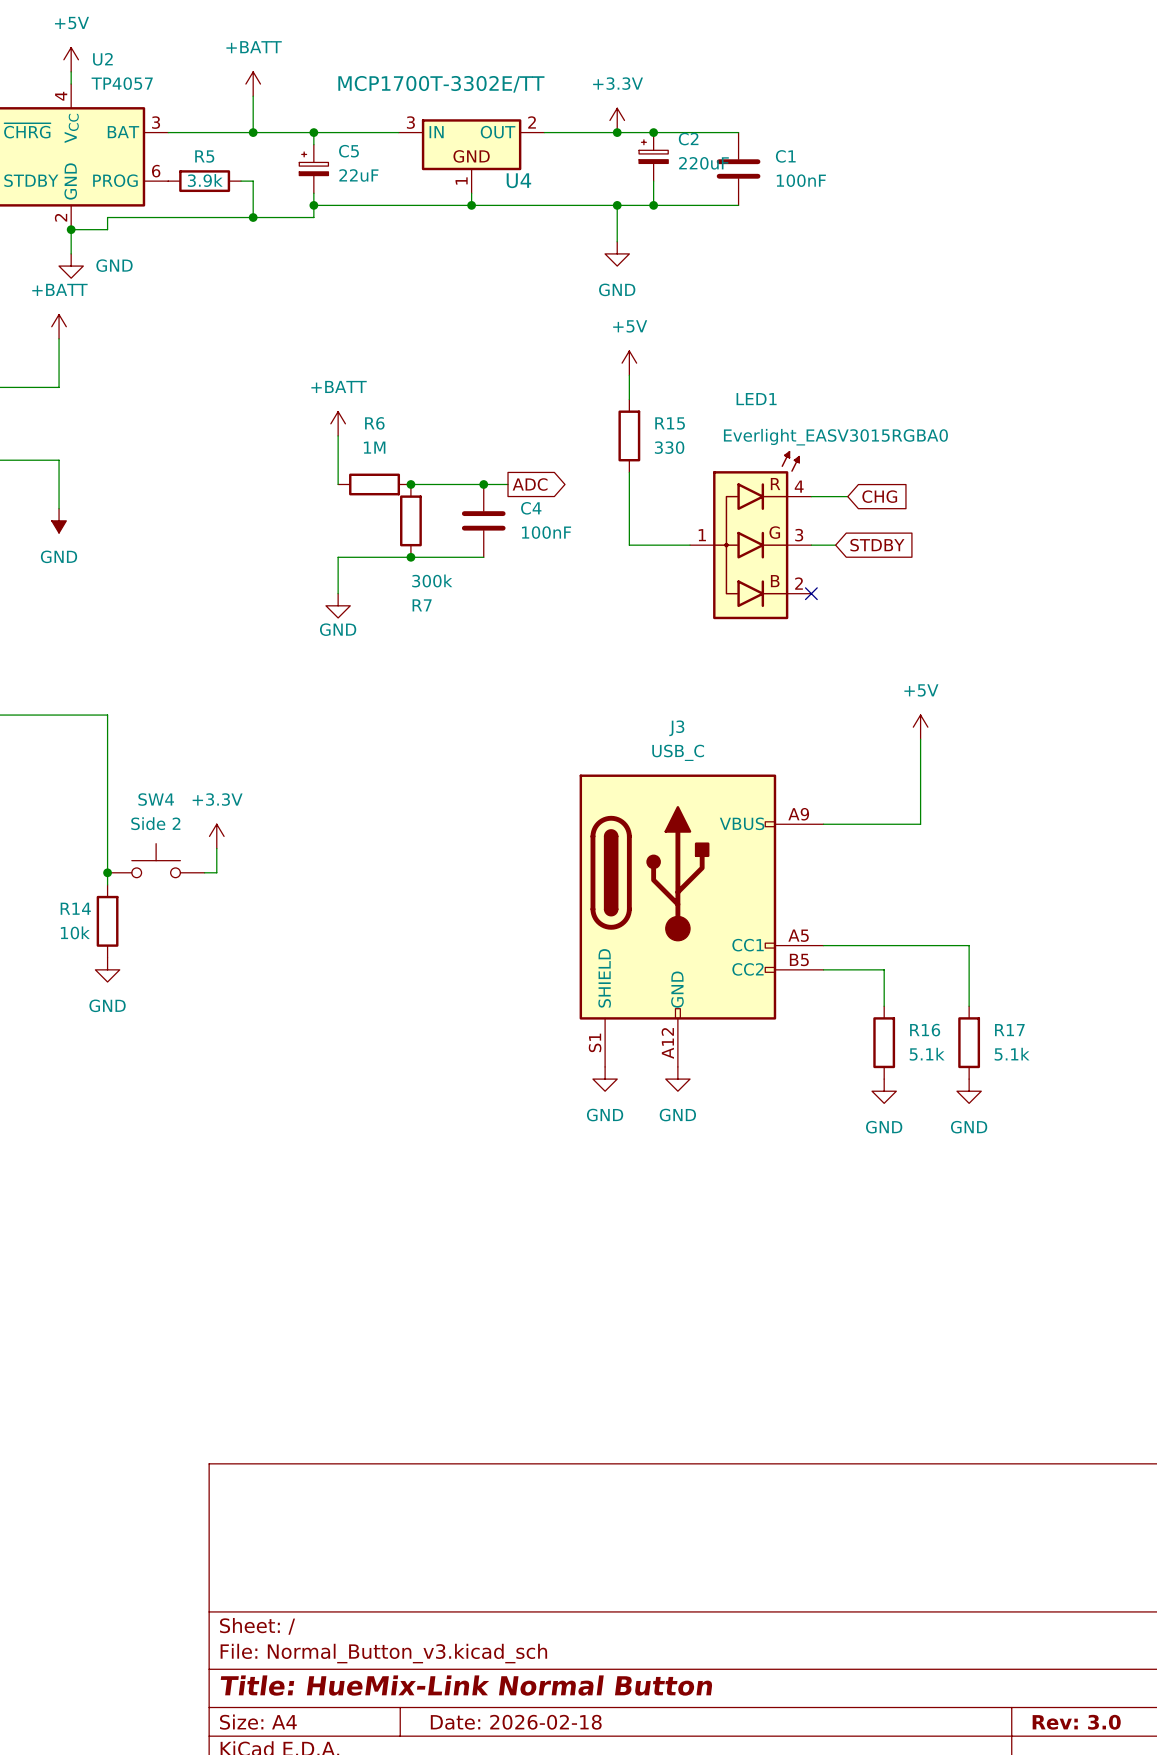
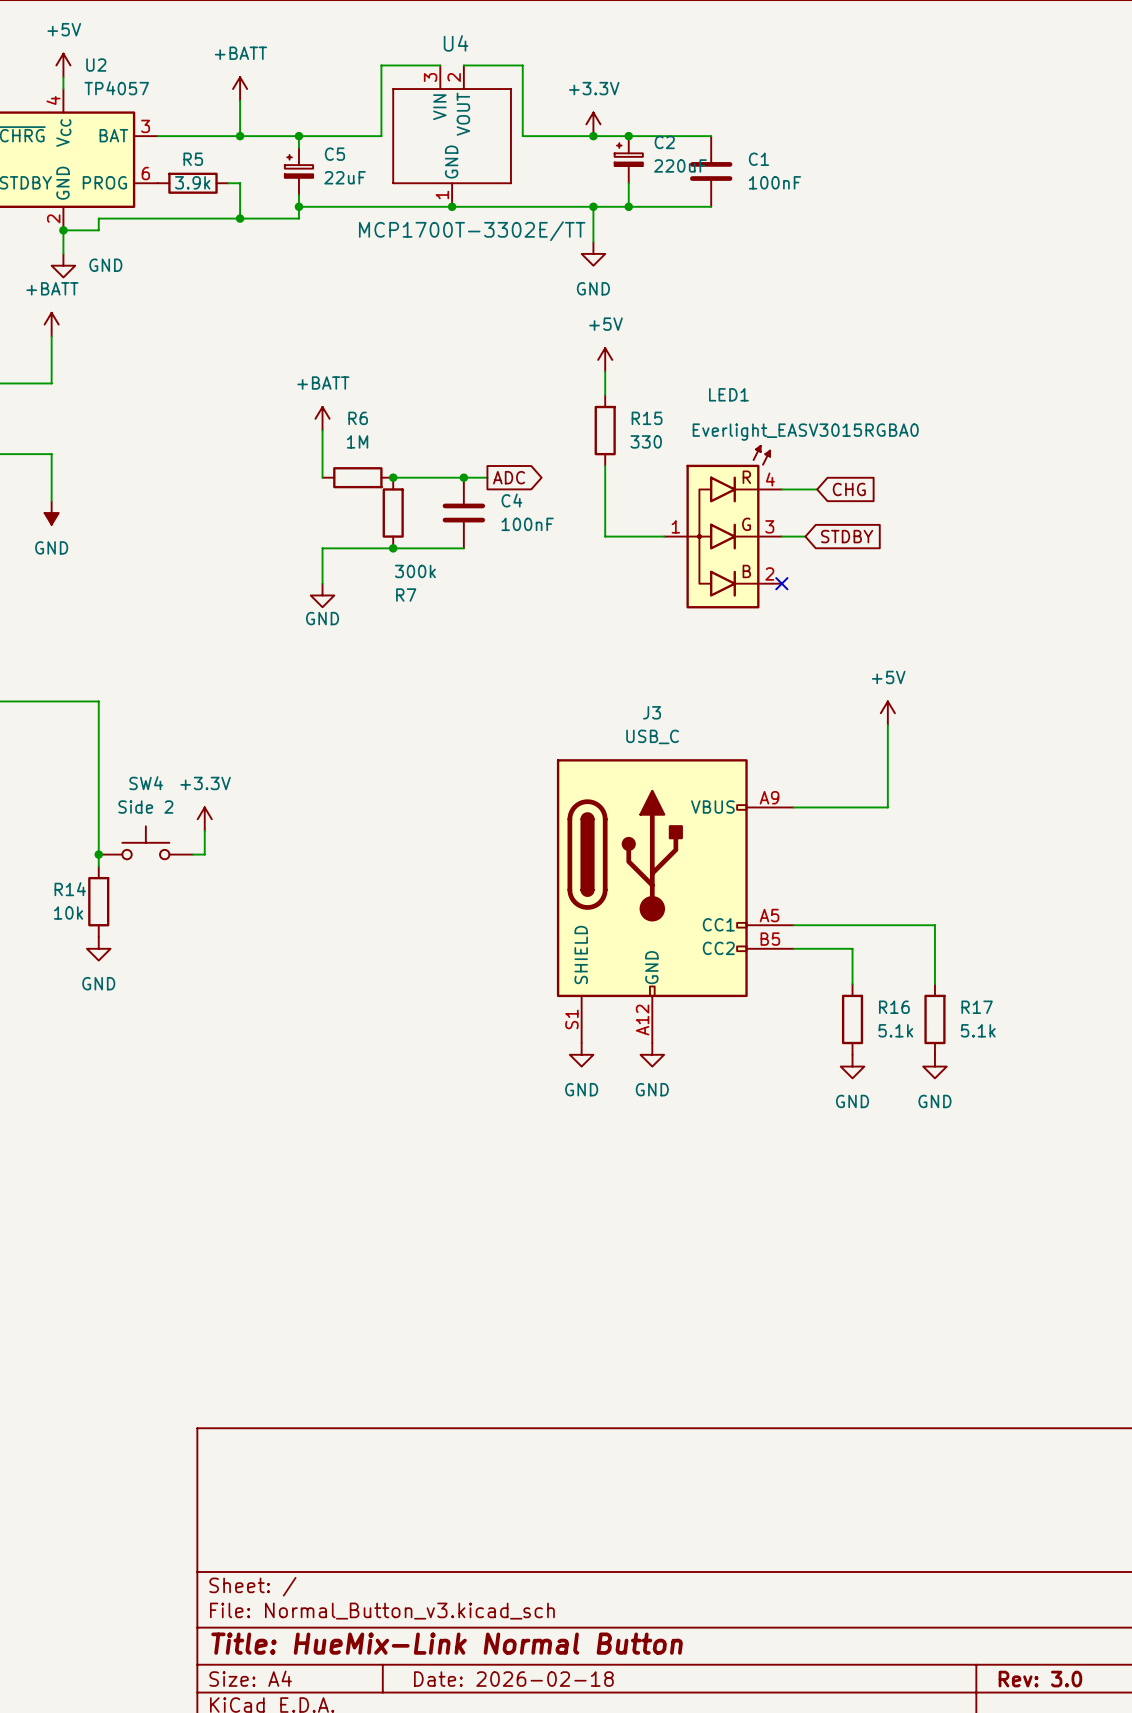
wire: none -> (440, 65) (381, 65) (381, 136)
wire: none -> (463, 65) (522, 65) (522, 136)
U4 value position: MCP1700T-3302E/TT (441, 84) -> MCP1700T-3302E/TT (472, 231)
U4 symbol: [398, 119, 545, 194] -> [392, 65, 512, 207]
U4 name position: U4 (518, 180) -> U4 (456, 43)

